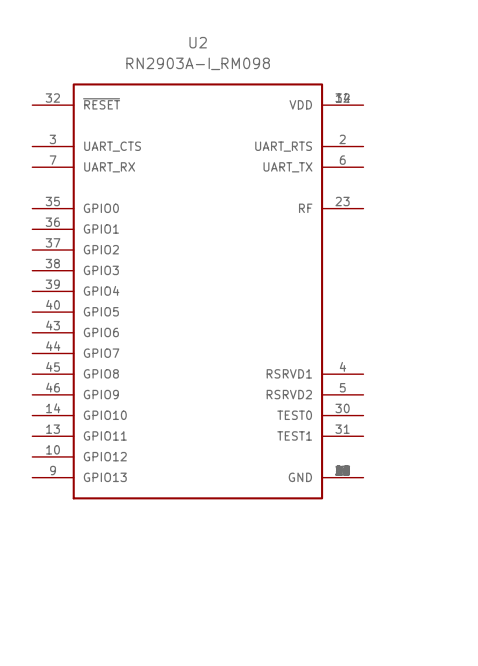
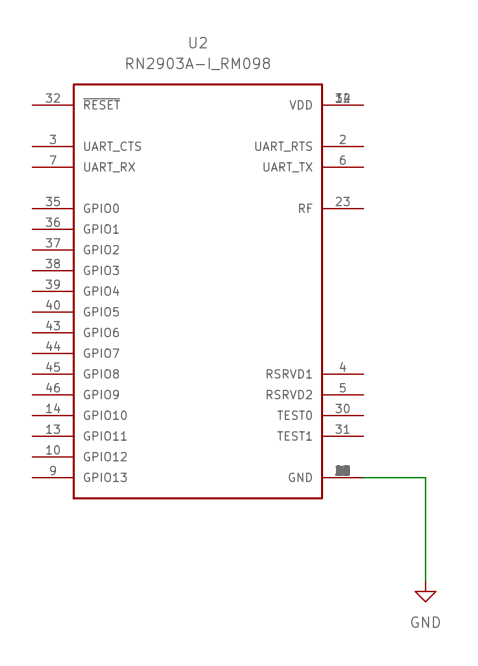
wire: none -> (363, 477) (425, 477) (425, 581)
power symbol: none -> GND (425, 591)

